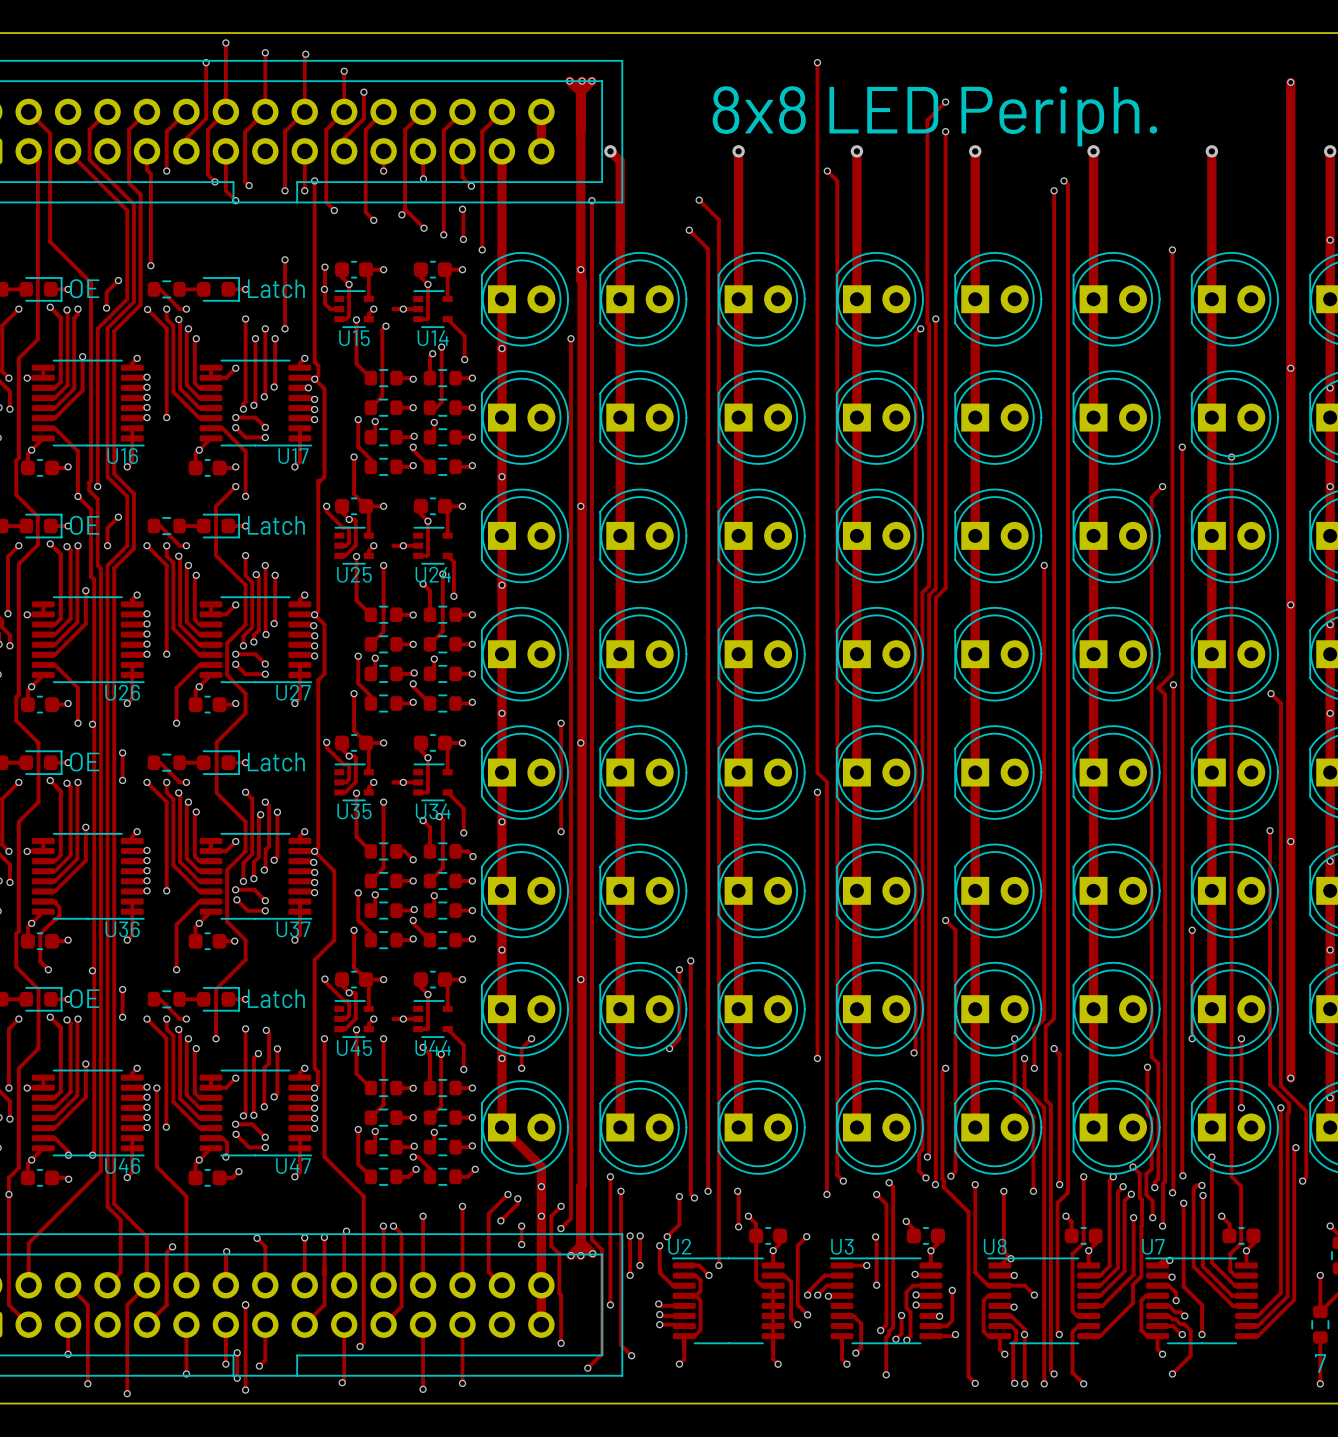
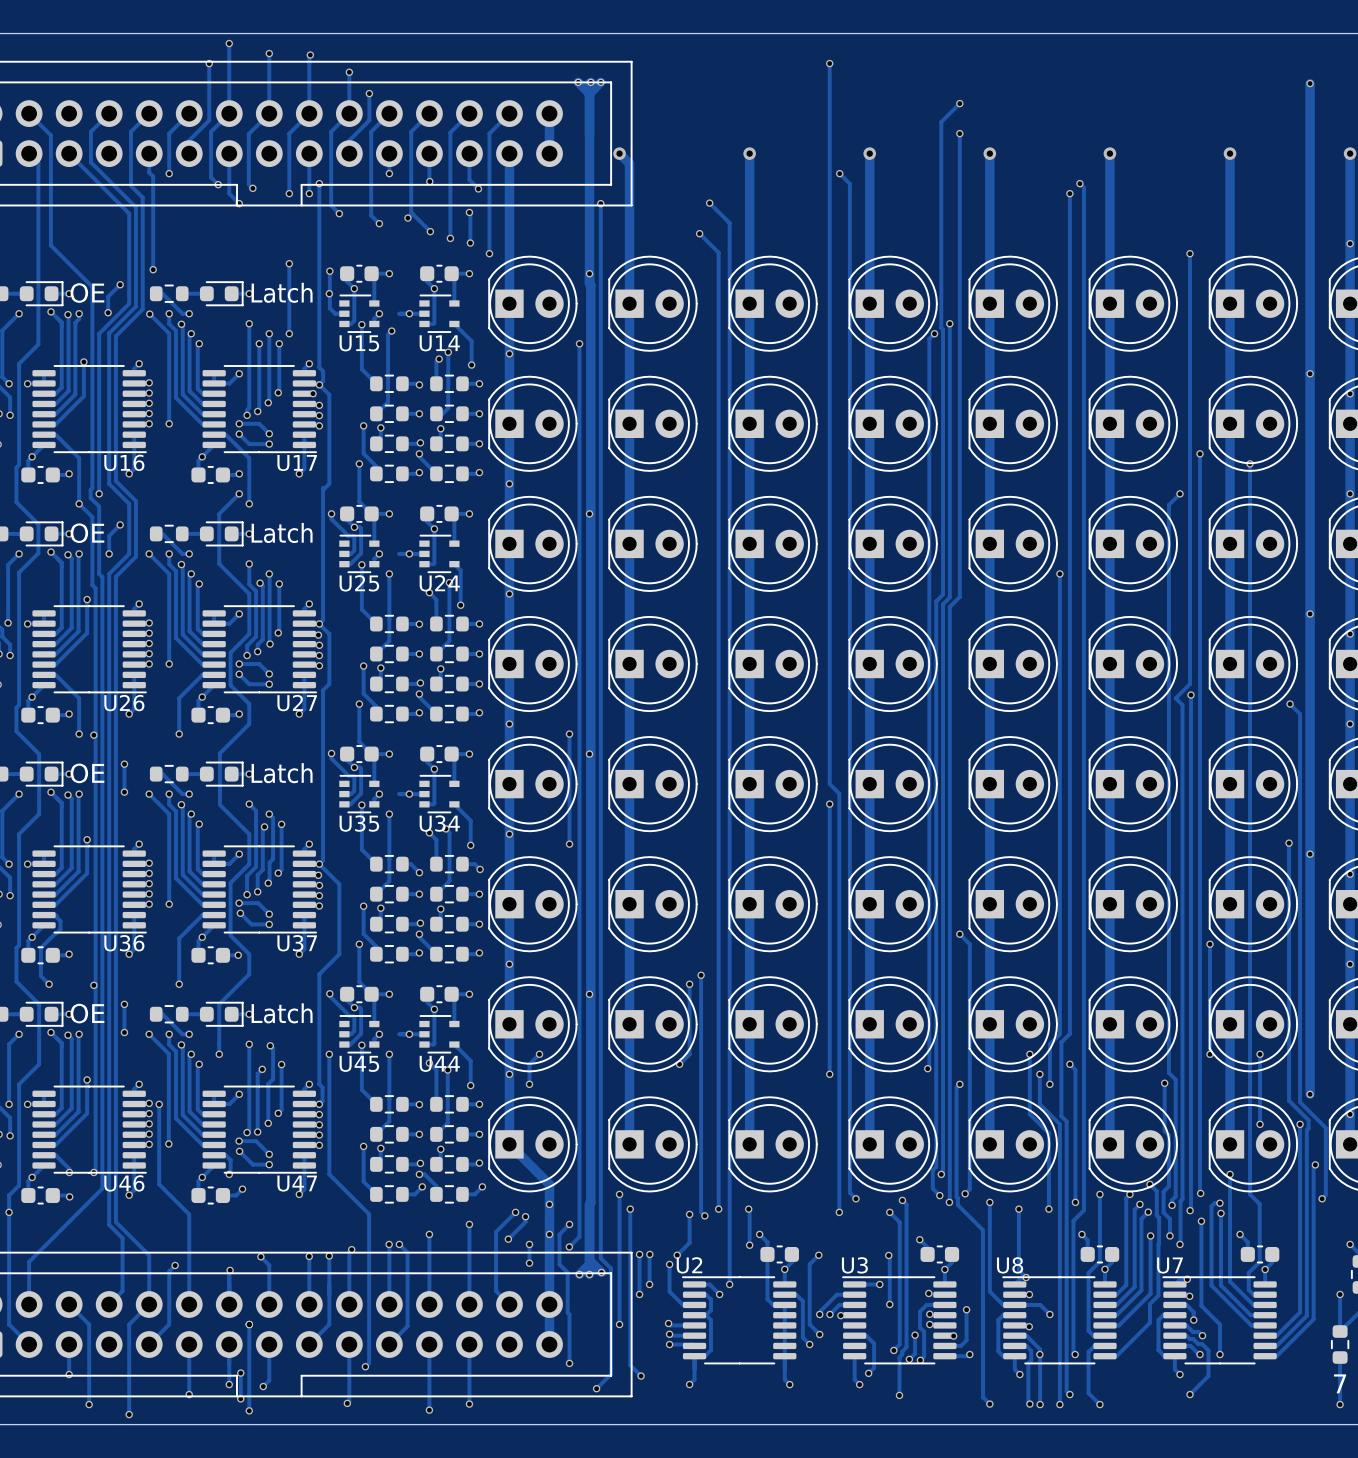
text: 8x8 LED Periph. (934, 116) -> none

